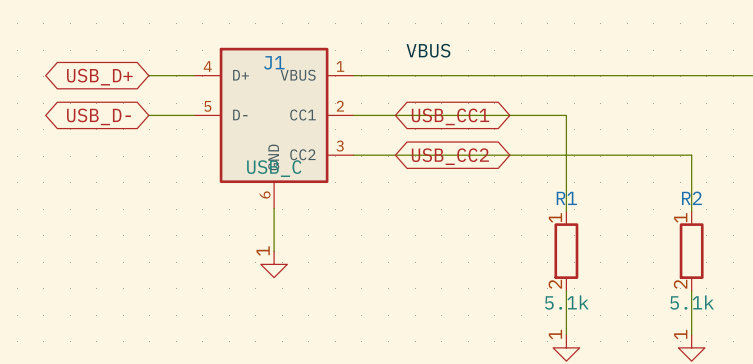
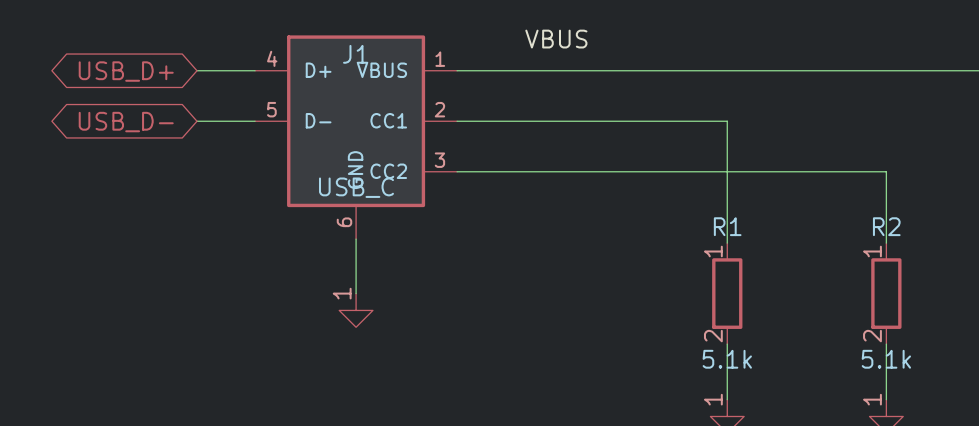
global label: USB_CC1 (450, 116) -> none
global label: USB_CC2 (450, 156) -> none

